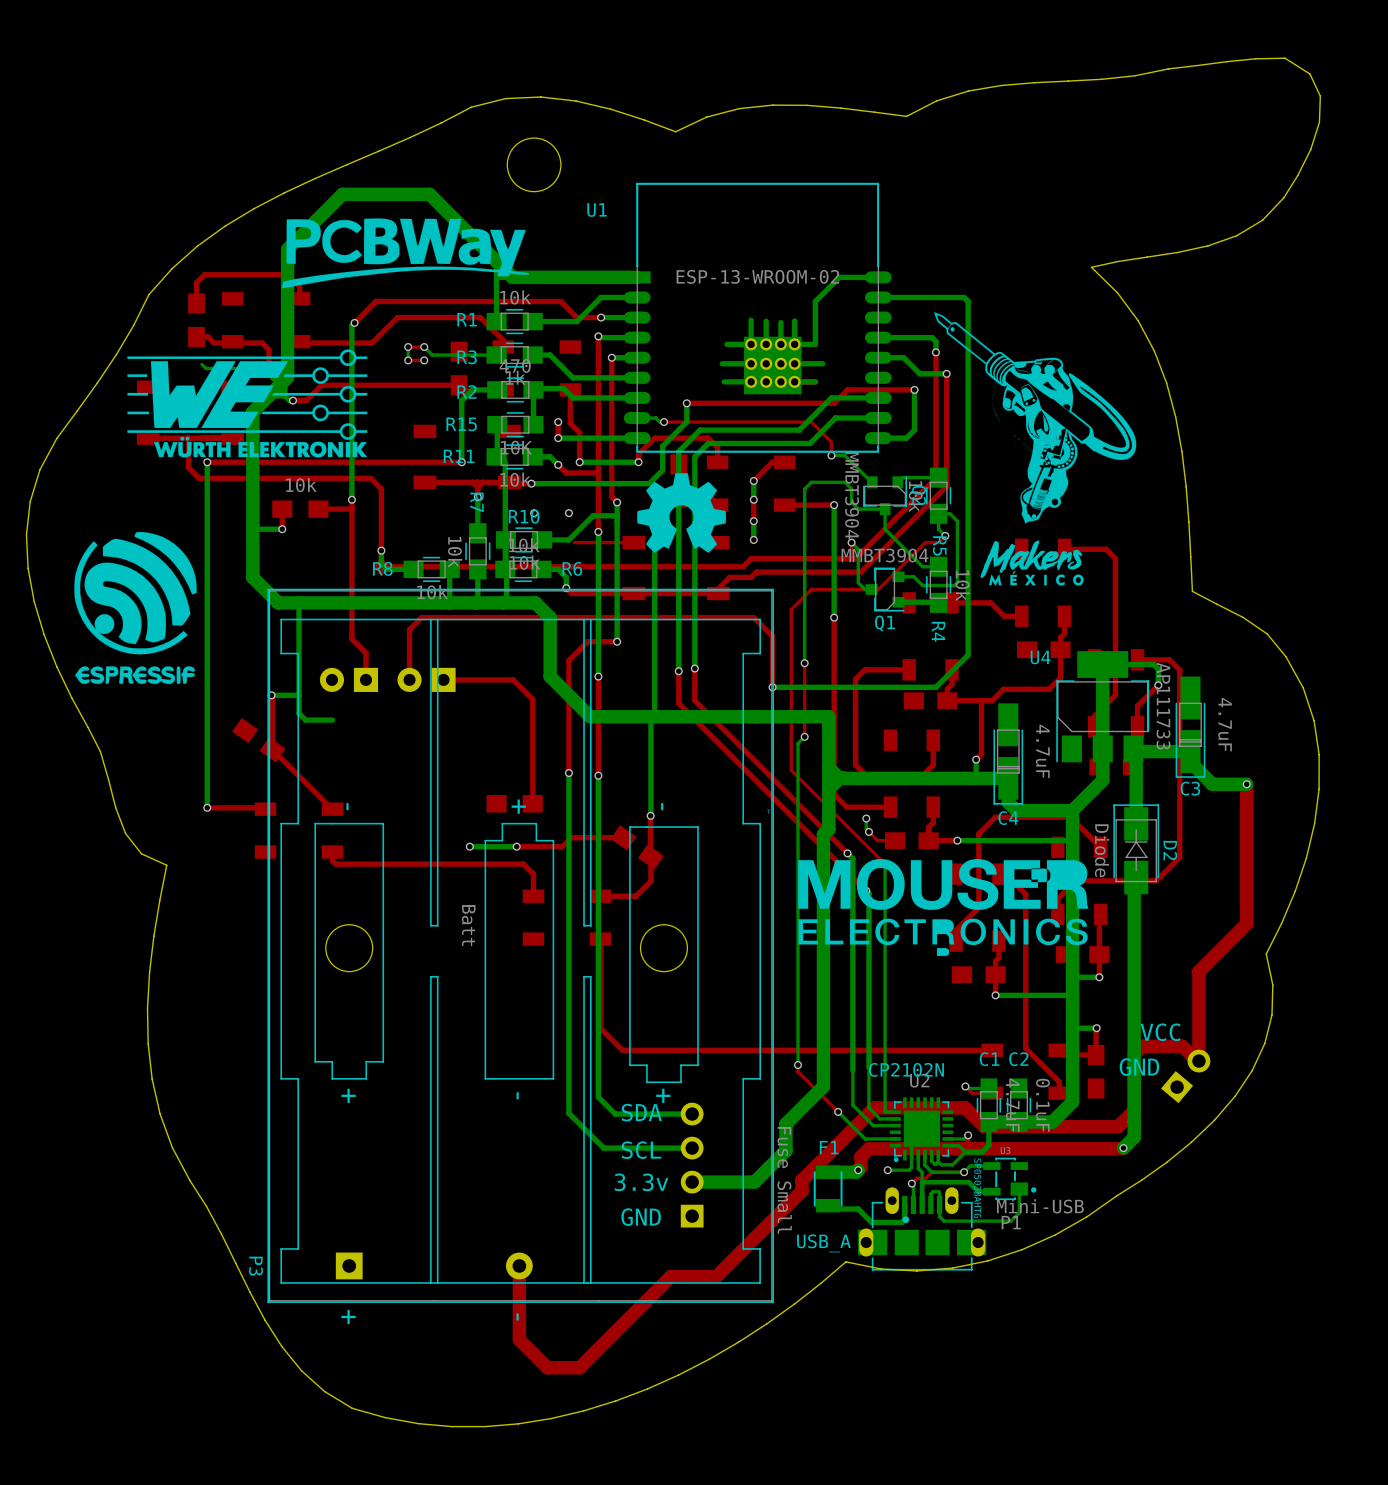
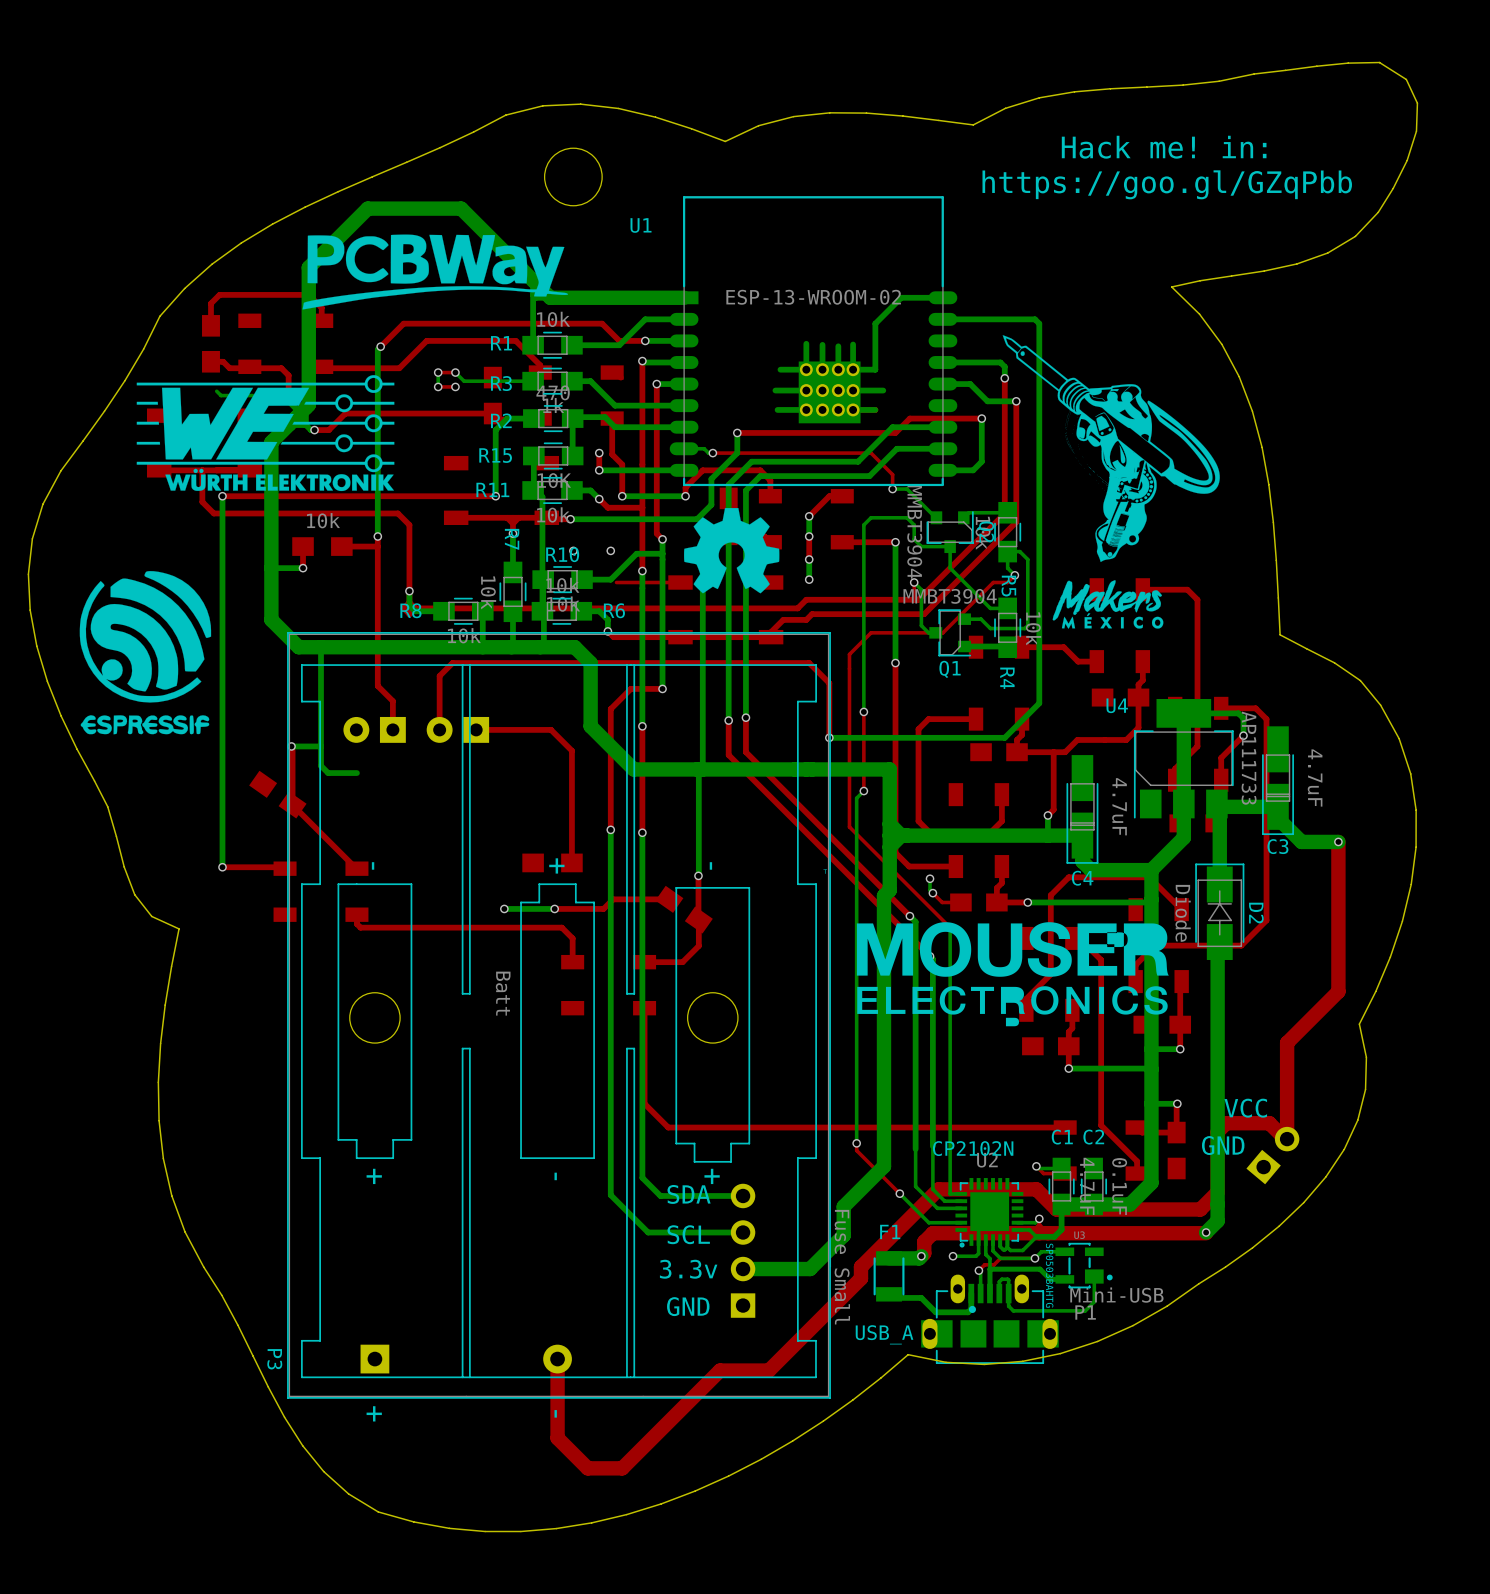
text: none -> Hack me! in: (1164, 147)
text: none -> https://goo.gl/GZqPbb (1167, 184)

